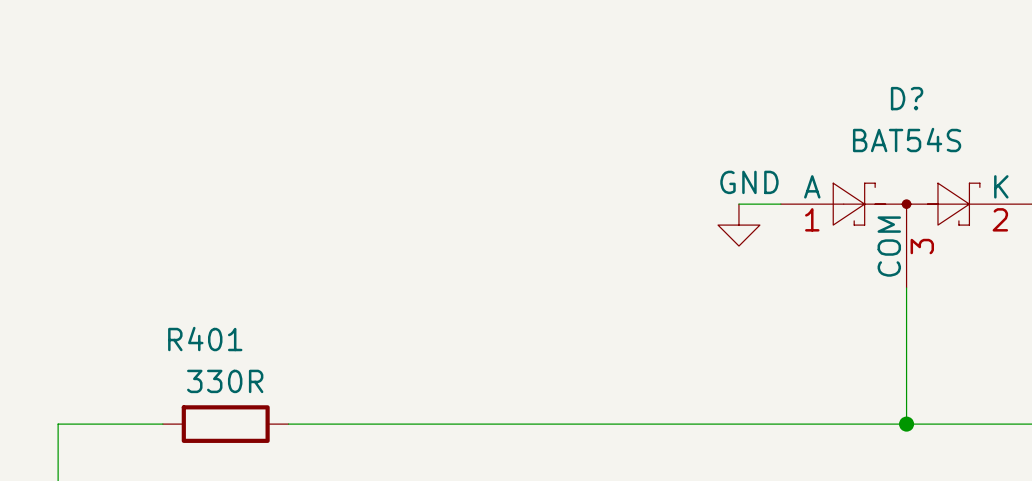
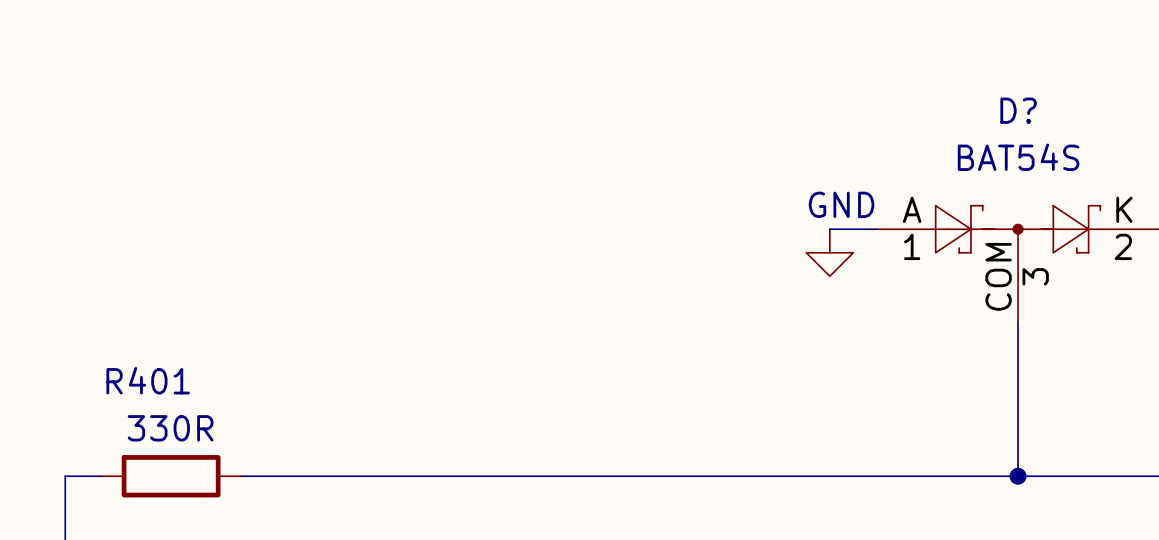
wire: (89, 424) (162, 424) -> (241, 476) (324, 476)
R401 position: (225, 424) -> (171, 476)

